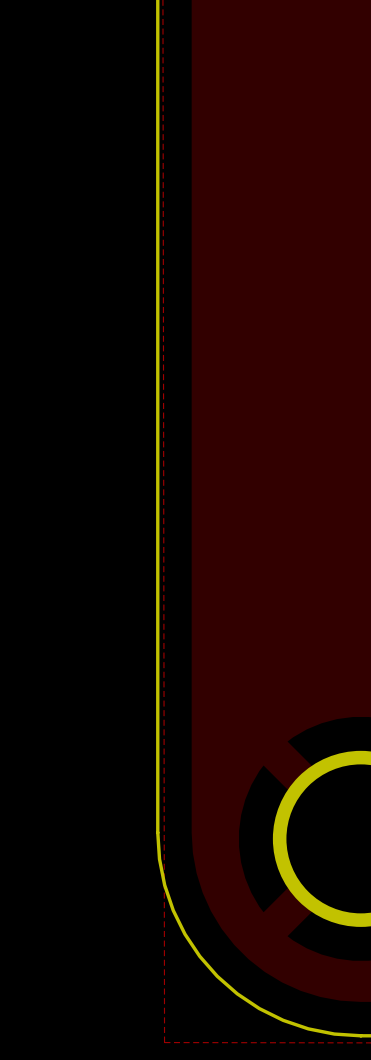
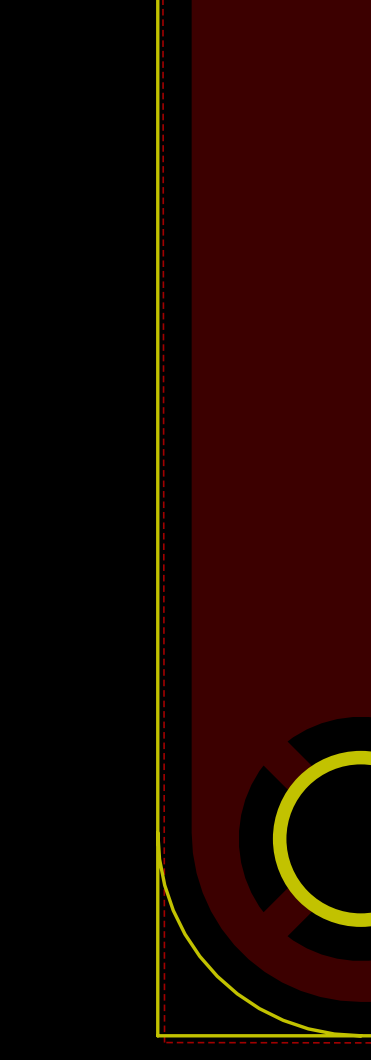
board edge: none -> (157, 832) (157, 1035) (360, 1035)

